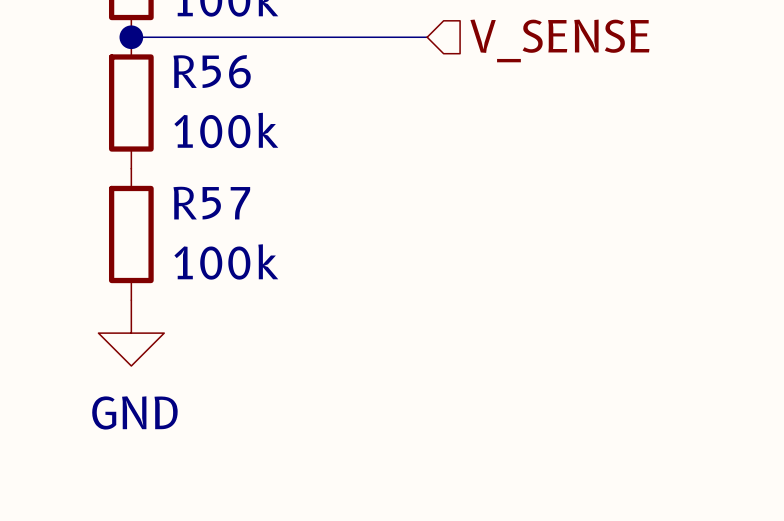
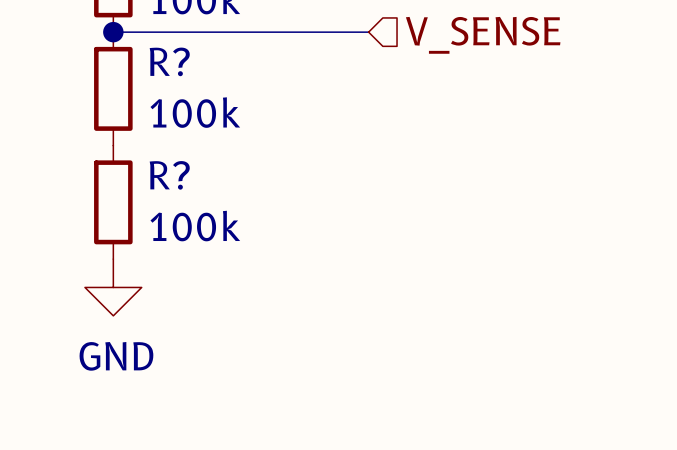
R56 name: R56 (212, 71) -> R? (169, 61)
R57 name: R57 (211, 203) -> R? (169, 175)

